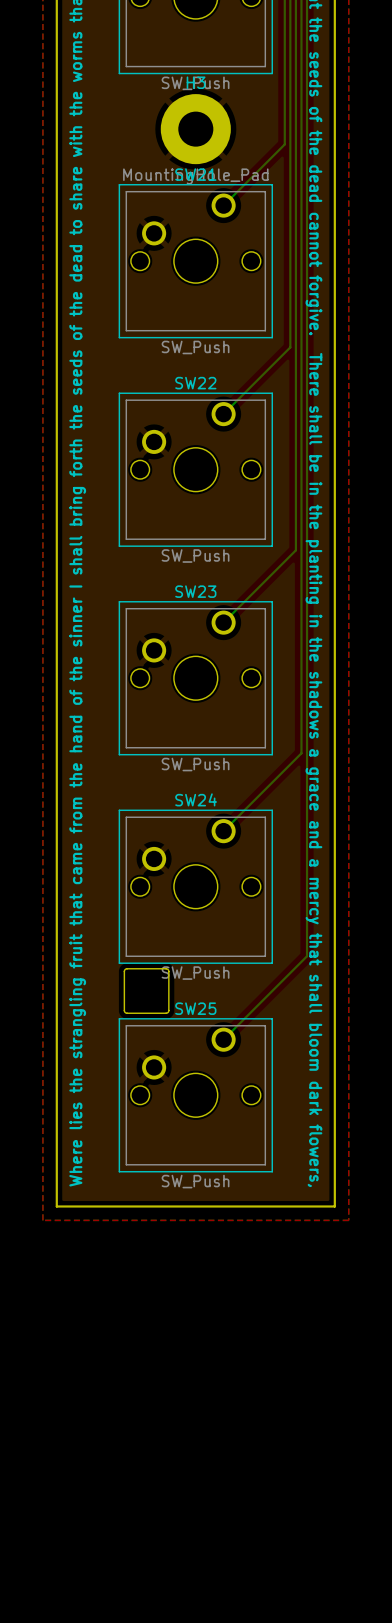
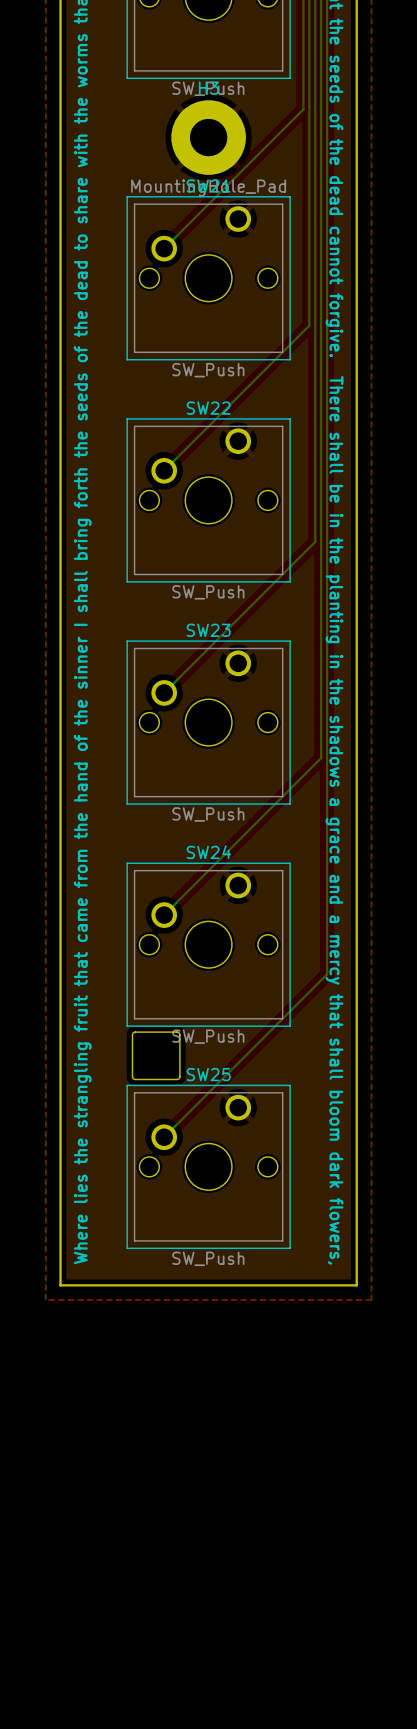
bottom track: (284, 102) (284, 144) (223, 205) -> (303, 109) (164, 248)
bottom track: (290, 305) (290, 347) (223, 414) -> (309, 325) (164, 470)
bottom track: (295, 508) (295, 550) (223, 622) -> (315, 541) (164, 692)
bottom track: (301, 711) (301, 753) (223, 831) -> (321, 758) (164, 915)
bottom track: (307, 914) (307, 956) (223, 1039) -> (327, 974) (164, 1137)

